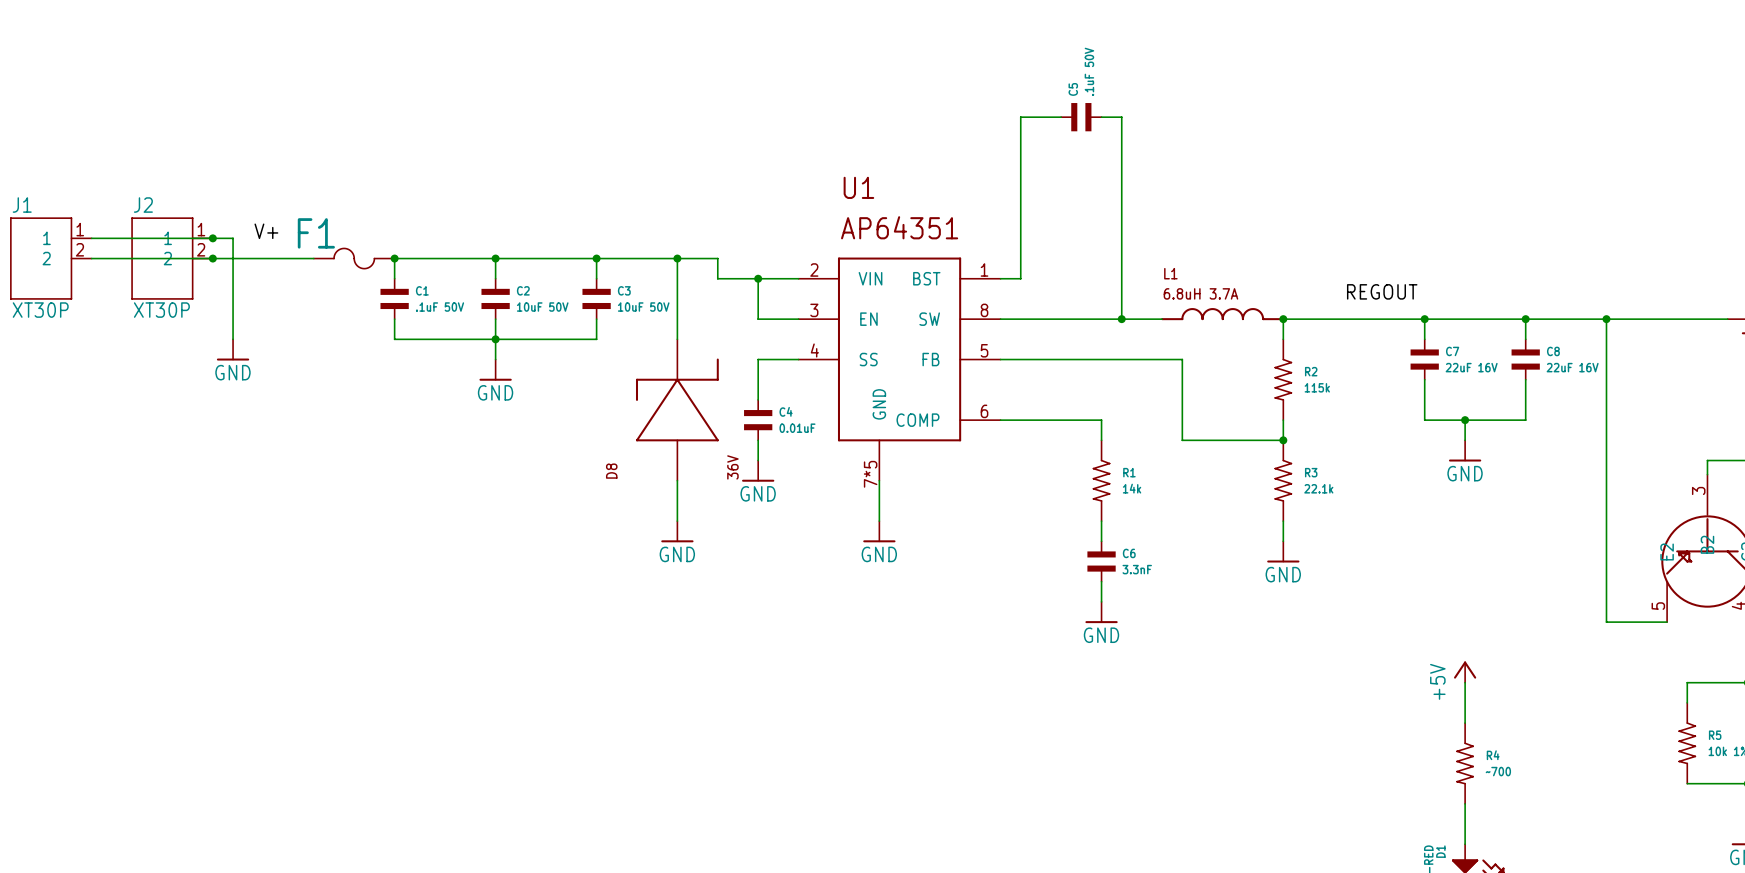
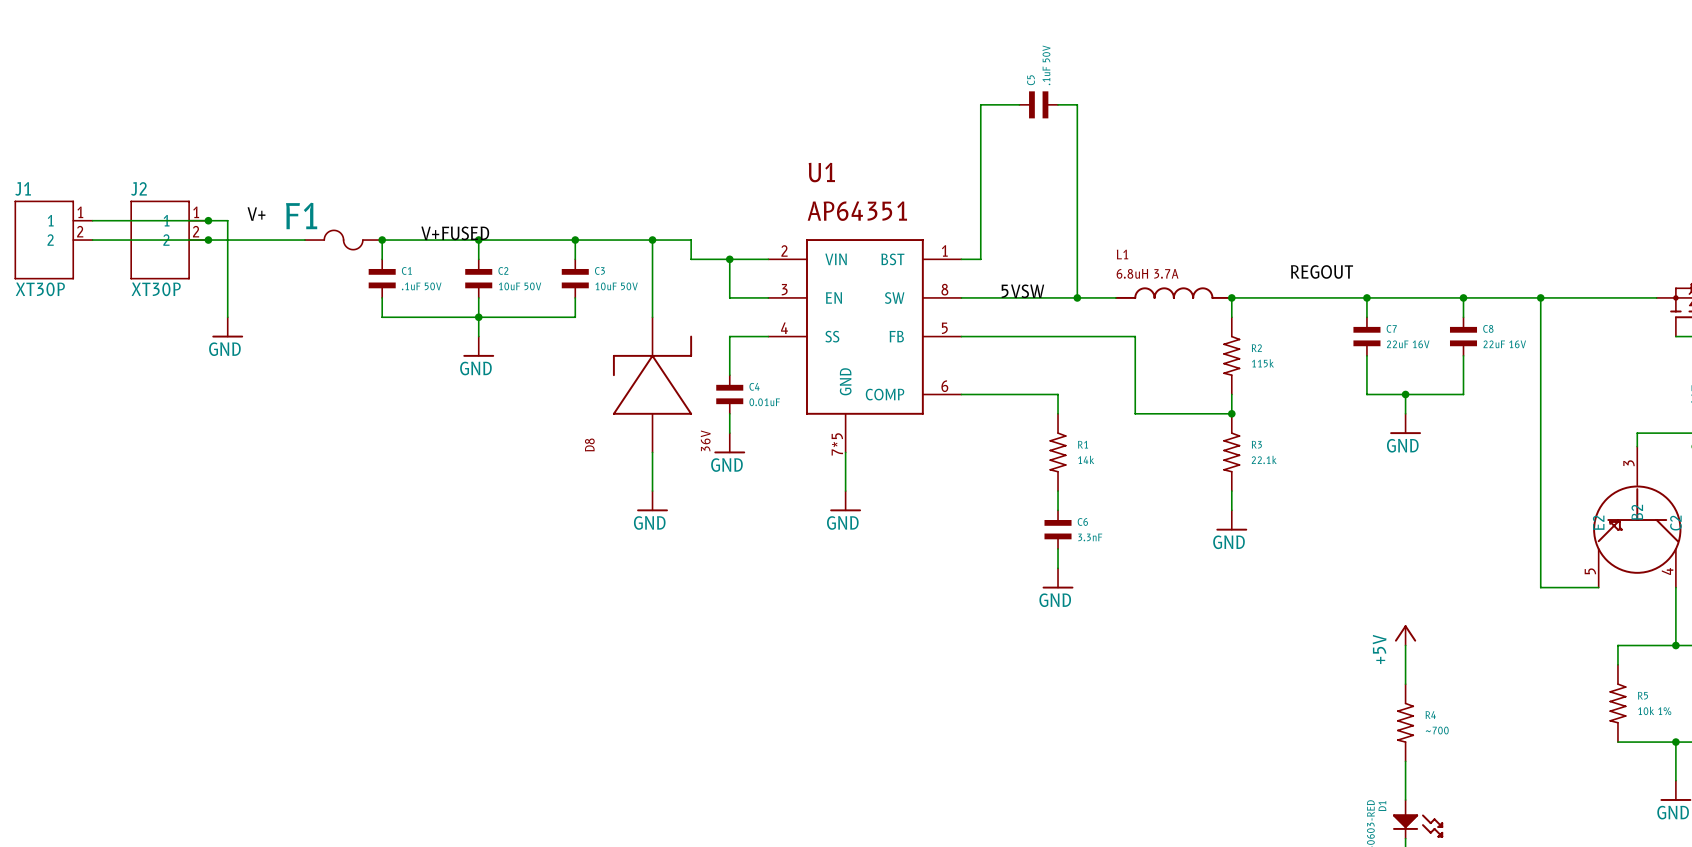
label: none -> V+FUSED (455, 233)
label: none -> 5VSW (1022, 291)

